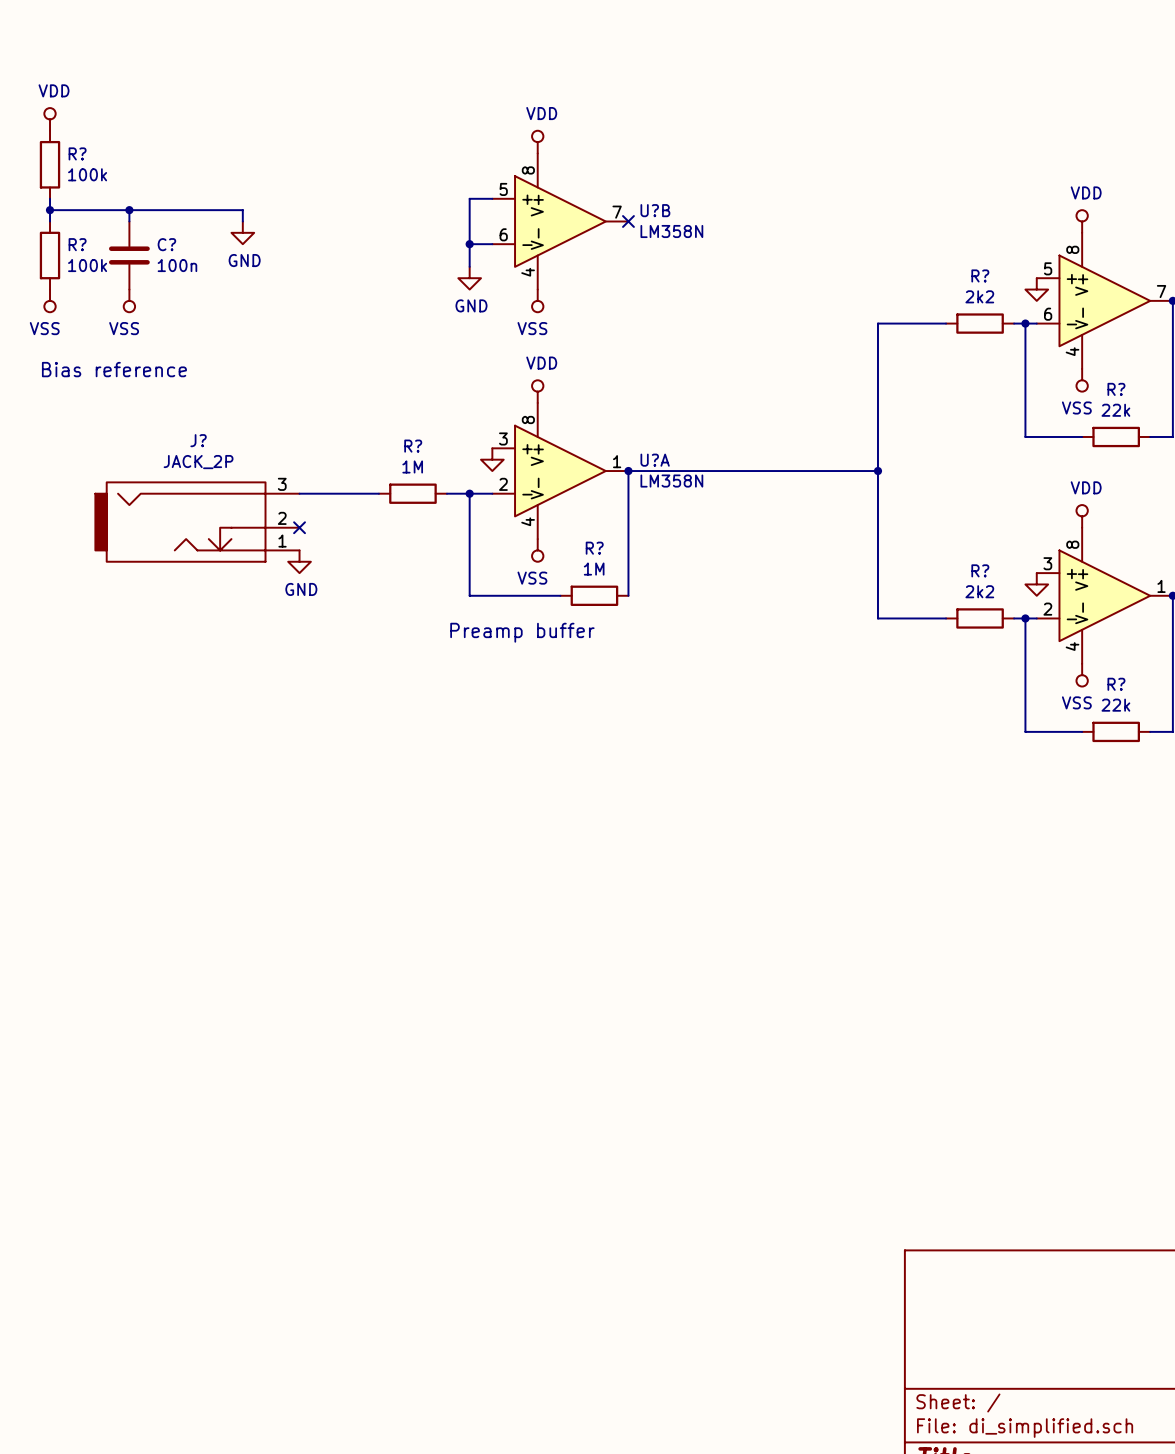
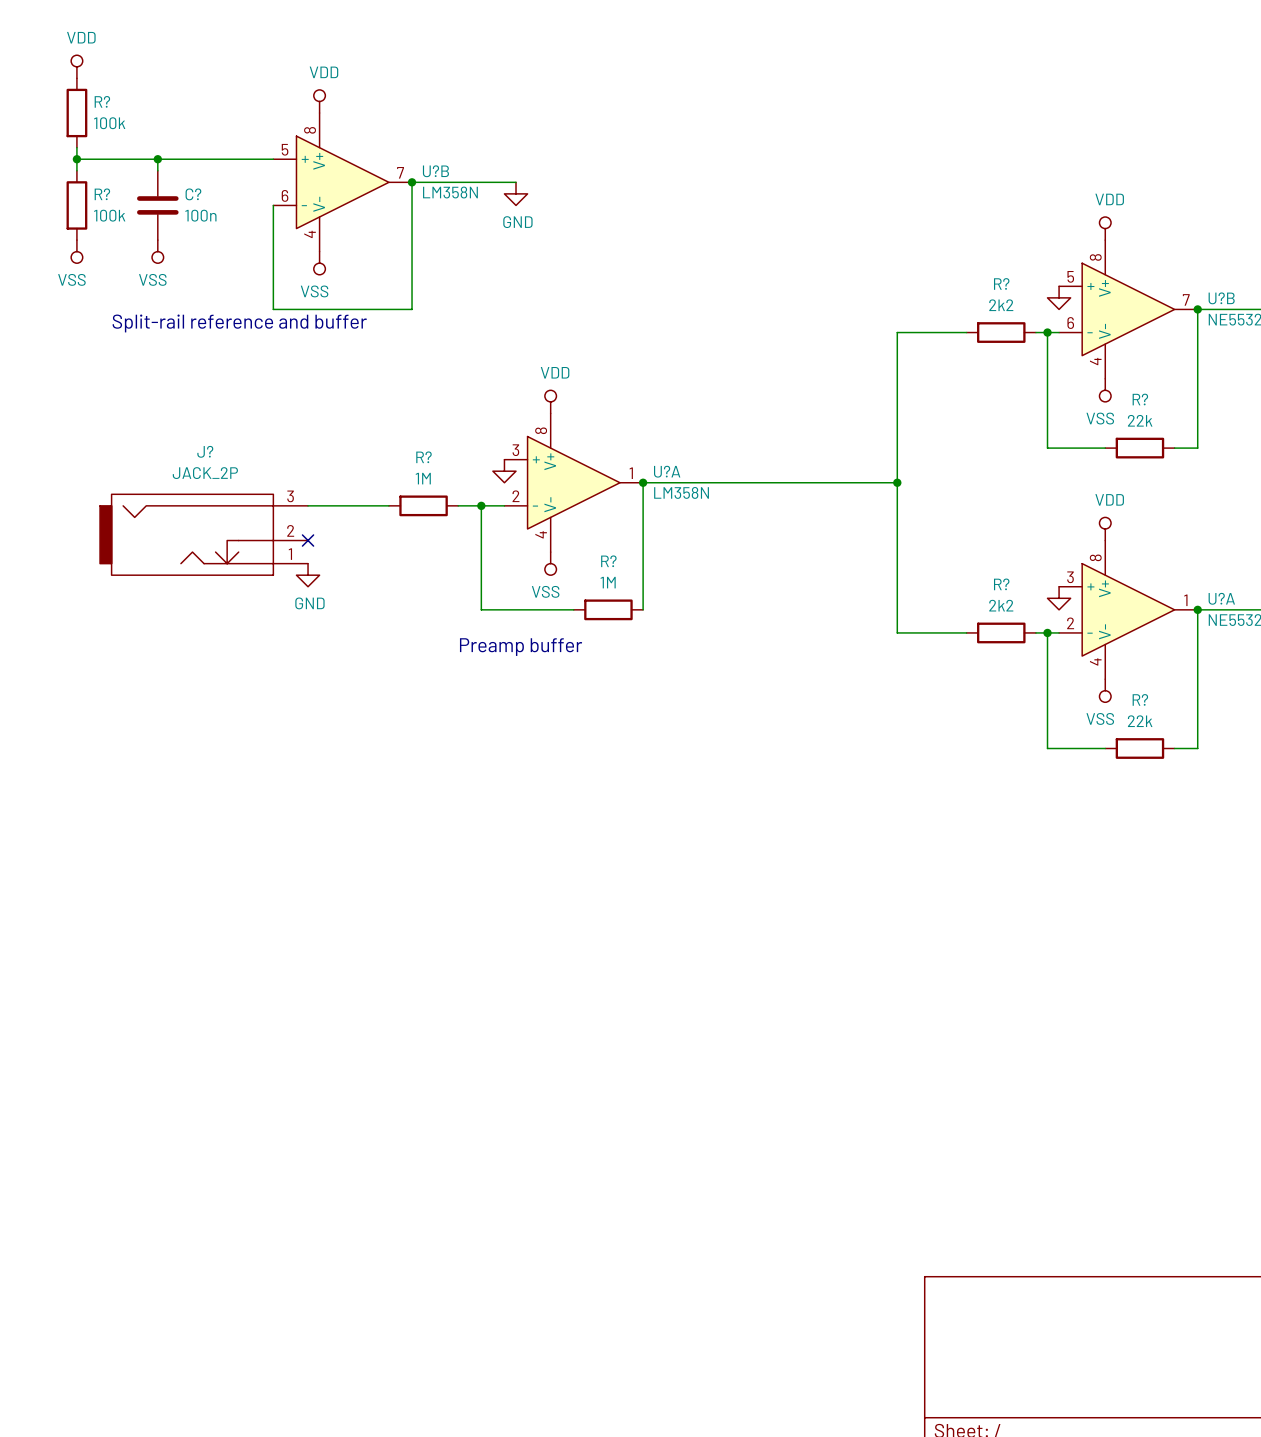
power symbol: none -> VDD (319, 101)
R?: none -> 100k (76, 113)
power symbol position: VDD (50, 119) -> VDD (76, 66)
power symbol: VDD (537, 142) -> none
wire: none -> (76, 159) (273, 159)
junction: none -> (76, 159)
junction: none -> (157, 159)
R?: 100k (50, 164) -> none
U?B: none -> LM358N (342, 182)
junction: none -> (412, 182)
wire: none -> (516, 182) (412, 182) (412, 309) (273, 309) (273, 205)
wire: (50, 198) (50, 221) -> (76, 147) (76, 170)
R?: none -> 100k (76, 205)
wire: (492, 198) (469, 198) (469, 266) -> none
wire: (50, 210) (242, 210) (242, 221) -> none
junction: (50, 210) -> none
wire: (129, 210) (129, 221) -> (157, 159) (157, 170)
junction: (129, 210) -> none
U?B: LM358N (560, 221) -> none
no-connect mark: (628, 221) -> none
power symbol: GND (242, 232) -> none
power symbol: none -> VSS (76, 251)
power symbol: none -> VSS (157, 251)
wire: (469, 244) (492, 244) -> none
junction: (469, 244) -> none
R?: 100k (50, 255) -> none
C? position: (129, 255) -> (157, 205)
power symbol: none -> VSS (319, 263)
power symbol position: GND (469, 278) -> GND (516, 193)
power symbol: VSS (50, 300) -> none
power symbol: VSS (129, 300) -> none
power symbol: VSS (537, 300) -> none
text: none -> Split-rail reference and buffer (239, 323)
text: Bias reference (114, 369) -> none

